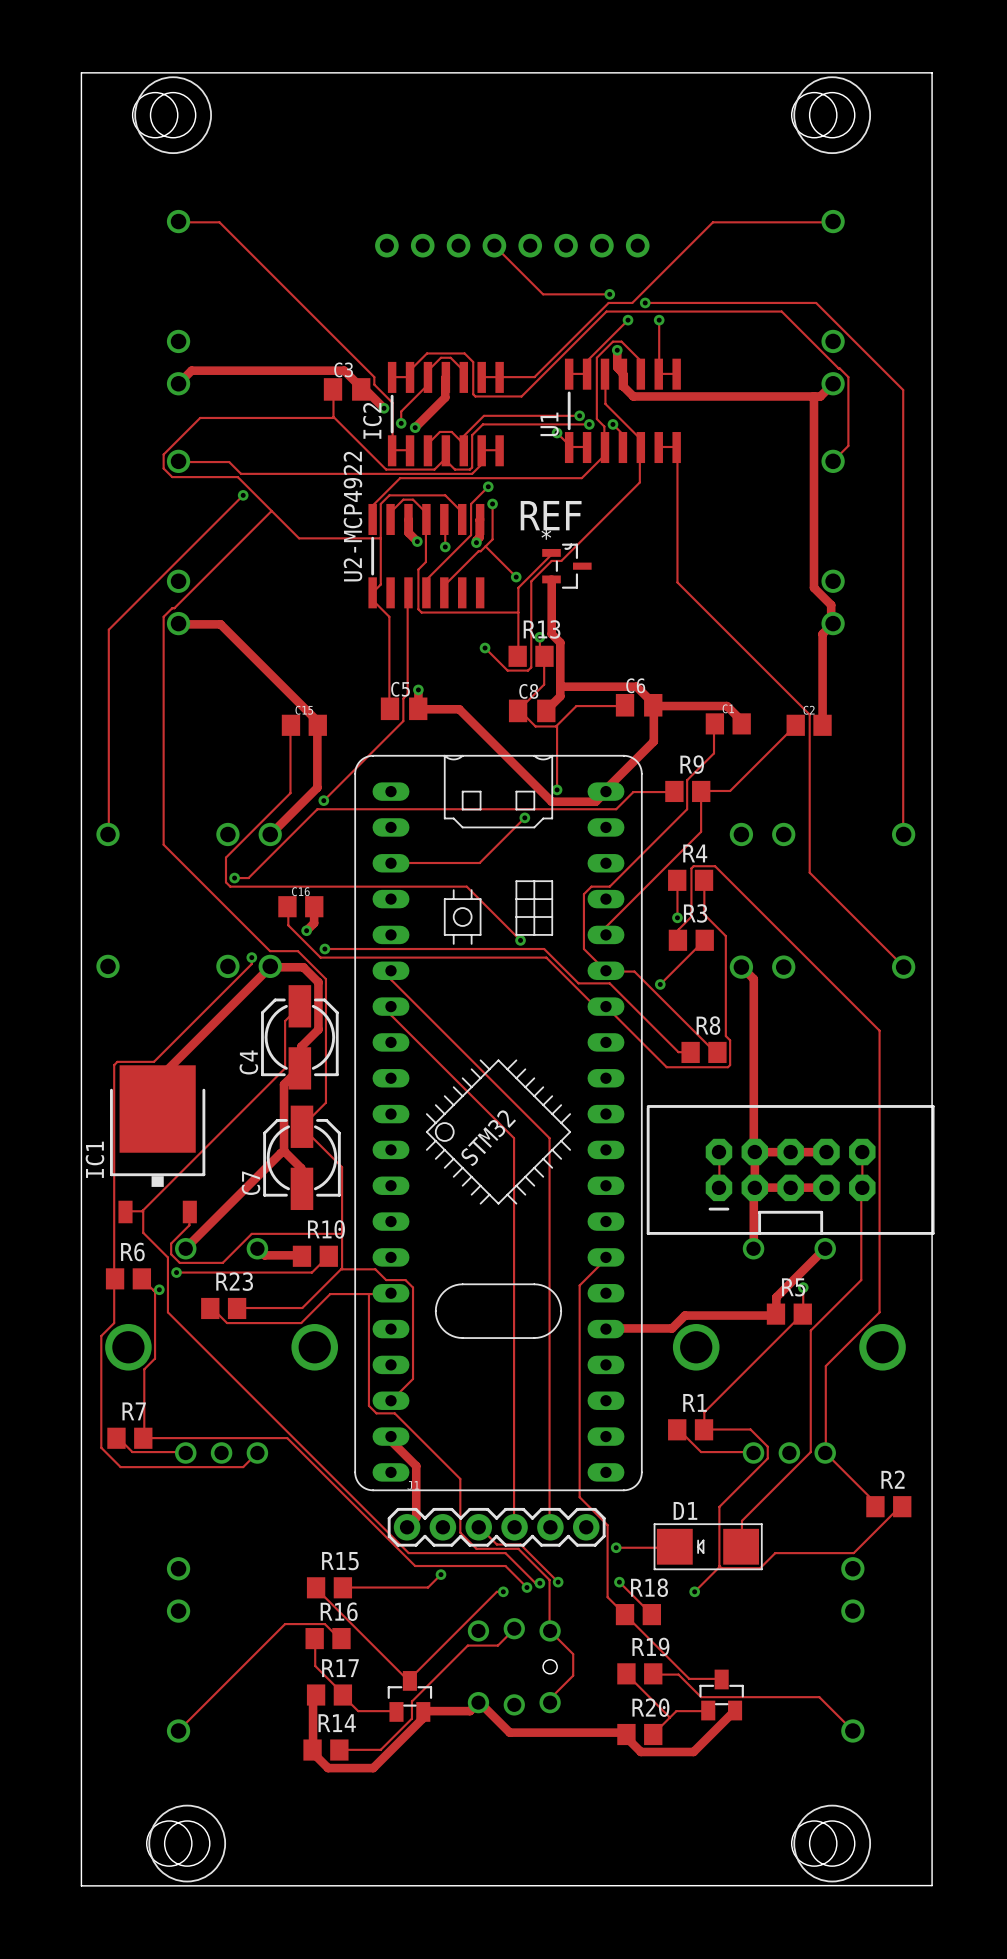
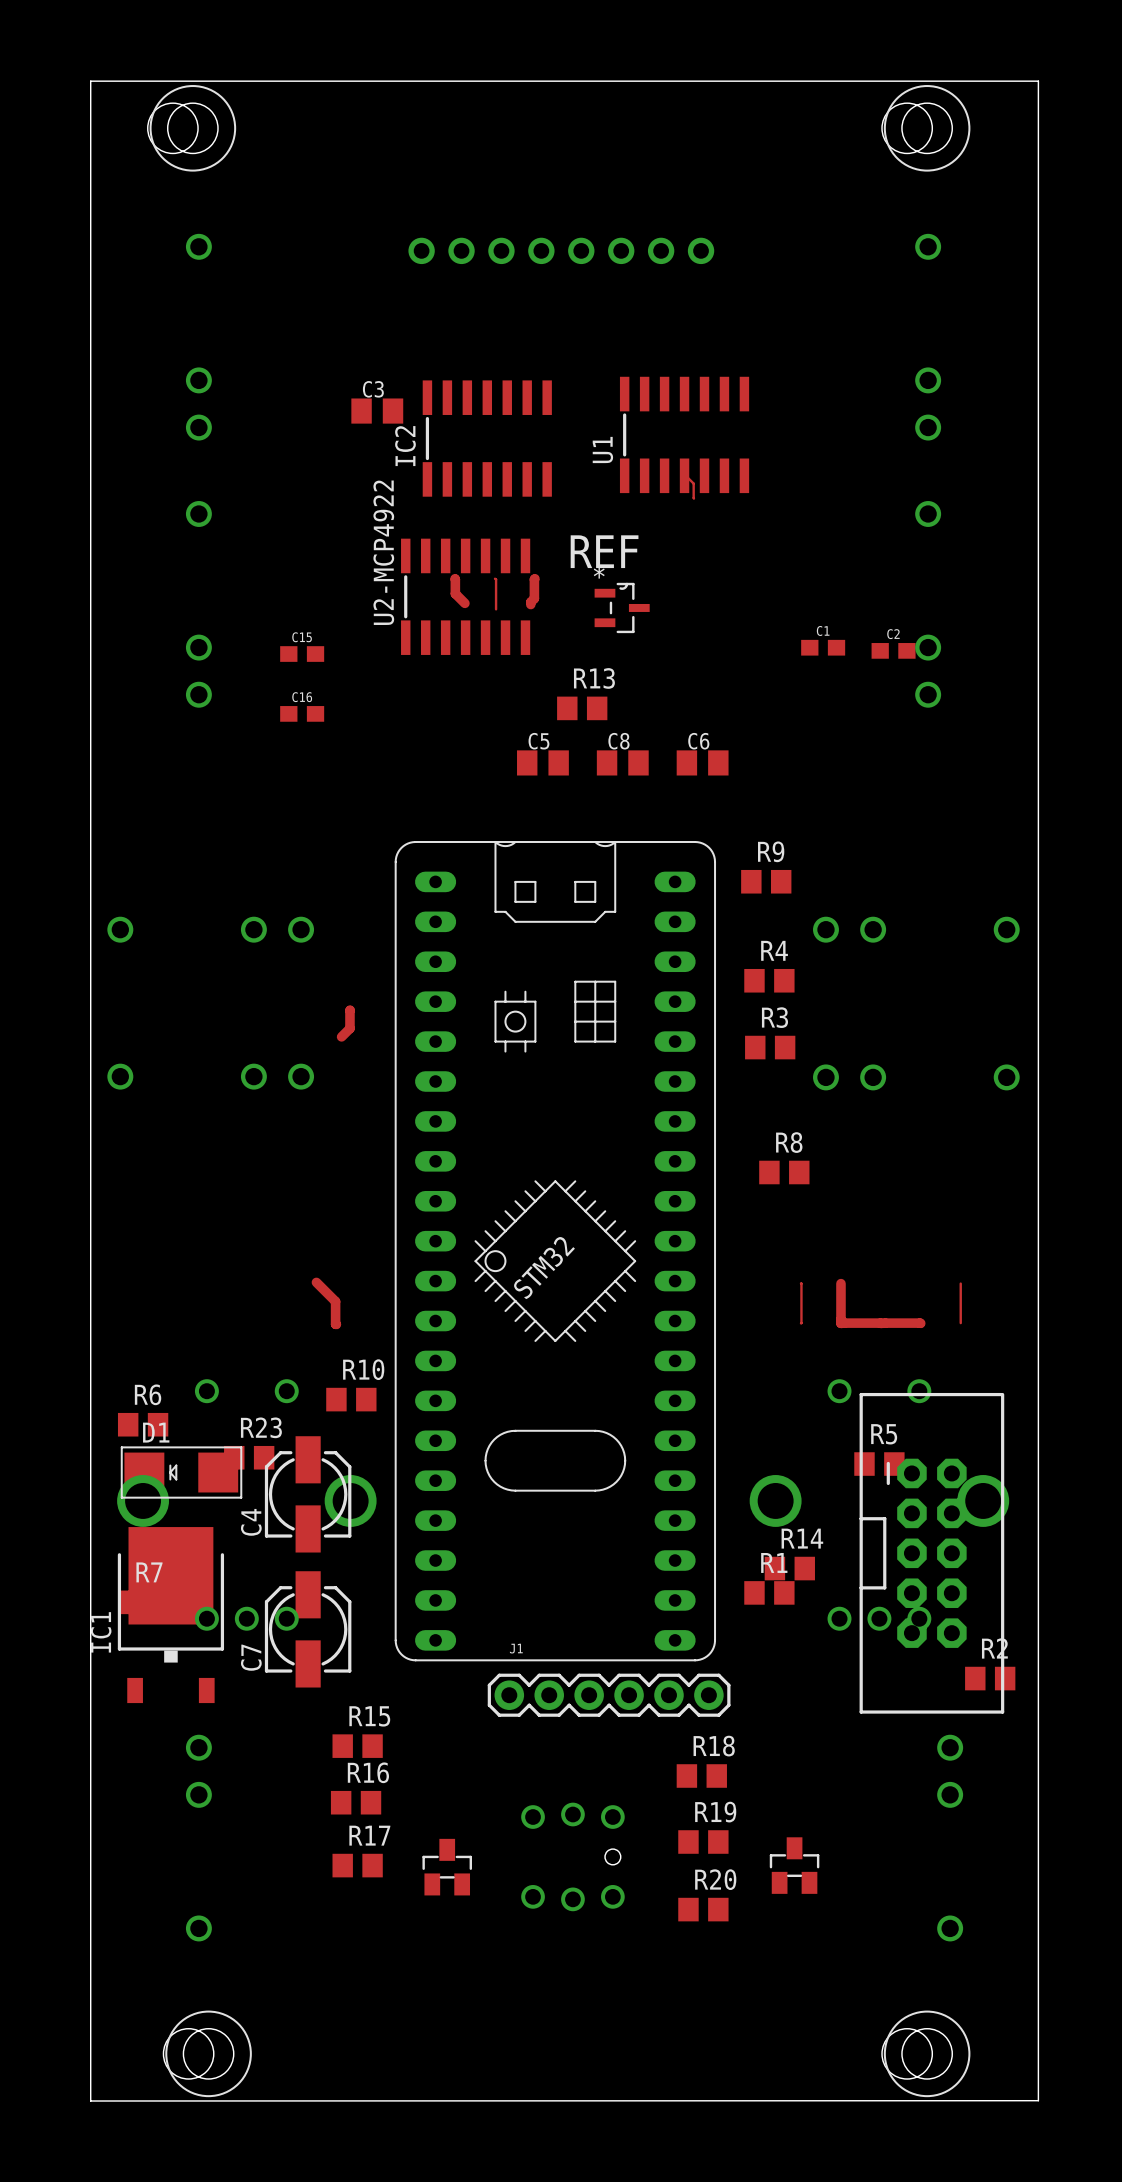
track: (178, 221) (219, 222) (374, 377) (374, 384) (392, 402) (392, 450) (410, 450) -> none
track: (833, 221) (712, 222) (632, 302) (608, 302) (534, 377) (481, 377) -> none
track: (494, 245) (543, 294) (609, 294) -> none
part position: (512, 245) -> (561, 250)
via: (609, 294) -> none
track: (645, 302) (816, 302) (903, 390) (903, 834) -> none
via: (645, 302) -> none
track: (628, 320) (586, 362) (587, 374) (569, 374) -> none
via: (628, 320) -> none
track: (659, 320) (658, 374) (676, 374) -> none
via: (659, 320) -> none
track: (617, 350) (617, 367) (623, 374) (623, 386) (633, 396) (820, 396) (833, 383) -> none
via: (617, 350) -> none
track: (604, 374) (605, 403) (639, 438) (639, 482) (561, 560) (551, 560) (531, 581) (531, 667) (528, 670) (507, 670) (485, 648) -> none
track: (640, 374) (639, 359) (621, 341) (612, 341) (596, 357) (596, 419) (604, 426) (604, 455) (581, 478) (400, 478) (373, 505) (372, 519) -> none
track: (392, 377) (410, 377) (409, 370) (427, 353) (464, 353) (473, 362) (473, 394) (475, 396) (521, 396) (606, 311) (781, 311) (848, 377) (848, 445) (833, 461) -> none
track: (445, 377) (445, 397) (415, 427) -> none
track: (463, 377) (463, 370) (450, 357) (440, 357) (428, 370) (427, 385) (401, 411) (401, 423) -> none
track: (178, 383) (191, 370) (344, 370) (360, 388) (365, 390) (384, 408) -> none
track: (333, 389) (333, 416) (386, 469) (434, 469) (445, 458) (445, 450) (445, 459) (454, 469) (470, 469) (472, 467) (472, 435) (482, 424) (589, 424) -> none
C3 position: (347, 389) -> (377, 411)
track: (813, 396) (813, 587) (831, 605) (831, 620) (833, 623) (822, 634) (822, 725) -> none
via: (384, 408) -> none
U1 position: (622, 410) -> (684, 434)
IC2 position: (445, 414) -> (487, 438)
track: (579, 415) (483, 415) (460, 439) (463, 450) (463, 443) (451, 431) (439, 431) (428, 443) (427, 450) -> none
via: (579, 415) -> none
track: (334, 417) (200, 417) (163, 454) (163, 468) (172, 477) (237, 477) (299, 538) (380, 538) -> none
via: (401, 423) -> none
via: (589, 424) -> none
via: (612, 424) -> none
via: (415, 427) -> none
track: (557, 433) (569, 445) (569, 447) (587, 447) -> none
via: (557, 433) -> none
track: (658, 447) (677, 448) (677, 582) (809, 714) (809, 872) (903, 967) -> none
track: (499, 450) (481, 450) (480, 465) (472, 473) (241, 473) (229, 462) (178, 461) -> none
track: (488, 486) (471, 503) (471, 535) (427, 579) (426, 592) -> none
via: (488, 486) -> none
track: (243, 495) (108, 629) (108, 834) -> none
via: (243, 495) -> none
track: (492, 503) (492, 539) (445, 584) (444, 592) -> none
via: (492, 503) -> none
track: (271, 510) (163, 616) (163, 844) (270, 951) (298, 951) (325, 979) (325, 1102) (301, 1126) (342, 1167) (342, 1268) (302, 1308) (237, 1308) -> none
track: (390, 519) (391, 511) (403, 499) (413, 499) (425, 512) (425, 562) (418, 569) (418, 609) (421, 612) (518, 612) -> none
track: (462, 519) (461, 511) (445, 495) (389, 495) (380, 503) (380, 584) (372, 592) (373, 600) (389, 616) (390, 708) -> none
via: (417, 541) -> none
via: (476, 542) -> none
via: (445, 546) -> none
track: (485, 546) (516, 577) -> none
track: (551, 552) (518, 587) (517, 656) -> none
U2-MCP4922 position: (426, 556) -> (465, 596)
REF position: (566, 566) -> (622, 607)
via: (516, 577) -> none
track: (551, 579) (551, 634) (560, 642) (560, 696) (546, 710) -> none
track: (408, 592) (407, 694) (403, 698) (403, 721) (323, 800) -> none
track: (178, 623) (220, 624) (317, 721) (317, 787) (270, 834) -> none
track: (539, 637) (539, 651) (544, 656) (544, 684) (518, 710) (535, 726) (556, 726) (576, 706) (625, 705) -> none
via: (539, 637) -> none
via: (485, 648) -> none
R13 position: (531, 656) -> (582, 708)
track: (560, 686) (636, 686) (653, 705) -> none
track: (418, 689) (418, 709) (459, 709) (551, 801) (595, 801) (653, 741) (653, 705) -> none
via: (418, 689) -> none
C6 position: (639, 705) -> (702, 762)
track: (653, 705) (726, 706) (740, 720) (741, 723) -> none
C5 position: (404, 708) -> (542, 762)
C8 position: (532, 710) -> (622, 762)
C1 footprint: [705, 713, 751, 735] -> [801, 639, 846, 656]
C15 footprint: [281, 714, 327, 736] -> [280, 646, 325, 662]
C2 footprint: [786, 714, 832, 736] -> [871, 643, 916, 659]
track: (714, 723) (714, 753) (687, 780) (687, 809) (609, 886) (591, 886) (583, 894) (583, 948) (606, 971) (634, 971) (717, 1052) -> none
track: (290, 725) (290, 793) (225, 857) (225, 882) (230, 886) (466, 886) (520, 940) -> none
track: (556, 725) (557, 789) -> none
track: (795, 725) (730, 790) (701, 791) (701, 831) (606, 926) (605, 934) -> none
via: (557, 789) -> none
track: (674, 791) (633, 792) (616, 809) (317, 809) (248, 878) (234, 878) -> none
via: (323, 800) -> none
track: (524, 817) (479, 863) (390, 863) -> none
via: (524, 817) -> none
via: (234, 878) -> none
track: (677, 880) (677, 917) -> none
track: (704, 880) (704, 914) (725, 936) (725, 1036) (730, 1040) (730, 1065) (727, 1067) (666, 1067) (605, 1005) (594, 1005) (546, 957) (320, 957) (288, 925) (287, 906) -> none
C16 footprint: [278, 896, 324, 918] -> [280, 706, 325, 722]
via: (677, 917) -> none
via: (306, 930) -> none
via: (520, 940) -> none
track: (677, 940) (678, 929) (691, 916) (691, 868) (693, 866) (715, 866) (879, 1030) (879, 1312) (825, 1366) (825, 1452) (875, 1502) (875, 1506) -> none
track: (704, 940) (660, 984) -> none
track: (324, 948) (544, 948) (578, 983) (609, 983) (678, 1052) (690, 1052) -> none
via: (324, 948) -> none
track: (251, 957) (251, 964) (153, 1061) (117, 1061) (114, 1065) (114, 1323) (101, 1335) (101, 1447) (120, 1467) (243, 1467) (257, 1452) -> none
via: (251, 957) -> none
track: (741, 967) (753, 979) (754, 1152) (826, 1152) -> none
track: (390, 970) (391, 980) (549, 1138) (550, 1527) -> none
via: (660, 984) -> none
track: (299, 1006) (285, 1021) (285, 1068) (142, 1211) (125, 1211) -> none
track: (390, 1006) (391, 1015) (514, 1138) (514, 1527) -> none
C4 position: (299, 1037) -> (308, 1494)
track: (157, 1109) (158, 1079) (270, 966) (303, 967) (318, 982) (318, 1029) (301, 1046) (299, 1068) (284, 1084) (284, 1151) (185, 1248) -> none
IC1 position: (157, 1144) -> (170, 1615)
C7 position: (301, 1157) -> (308, 1629)
part rotation: 0° (790, 1169) -> 90° clockwise (931, 1553)
part position: (790, 1169) -> (931, 1553)
track: (754, 1187) (753, 1248) -> none
track: (862, 1187) (861, 1280) (810, 1330) (810, 1452) (741, 1520) (741, 1546) -> none
track: (142, 1210) (143, 1232) (167, 1257) (167, 1312) (408, 1553) (505, 1553) (535, 1583) (539, 1583) -> none
track: (189, 1211) (189, 1225) (171, 1243) (171, 1254) (179, 1262) (222, 1262) (251, 1233) (342, 1233) -> none
track: (257, 1248) (264, 1255) (301, 1256) -> none
track: (825, 1248) (776, 1297) (775, 1314) (684, 1315) (672, 1328) (605, 1329) -> none
track: (328, 1256) (311, 1272) (176, 1272) -> none
track: (605, 1257) (579, 1285) (579, 1497) (607, 1525) (607, 1597) (689, 1678) (721, 1679) -> none
track: (341, 1268) (375, 1269) (386, 1280) (405, 1280) (413, 1287) (413, 1378) (390, 1400) -> none
via: (176, 1272) -> none
track: (141, 1278) (155, 1291) (155, 1358) (144, 1369) (143, 1438) (287, 1438) (415, 1566) (505, 1566) (526, 1587) -> none
track: (803, 1287) (802, 1314) (704, 1412) (704, 1429) (750, 1429) (767, 1446) (767, 1458) (719, 1506) (719, 1566) (721, 1568) (760, 1568) (775, 1553) (853, 1553) (902, 1506) -> none
via: (803, 1287) -> none
via: (159, 1289) -> none
track: (390, 1293) (330, 1294) (301, 1323) (227, 1323) (210, 1308) -> none
track: (368, 1294) (368, 1405) (376, 1413) (394, 1413) (460, 1478) (460, 1532) (476, 1548) (518, 1548) (549, 1579) (549, 1630) (573, 1654) (573, 1675) (550, 1698) (550, 1702) -> none
track: (677, 1429) (701, 1452) (753, 1452) -> none
track: (390, 1436) (391, 1441) (416, 1466) (416, 1517) (407, 1527) -> none
track: (116, 1438) (132, 1452) (185, 1452) -> none
track: (478, 1527) (496, 1544) (520, 1544) (558, 1582) -> none
J1 position: (496, 1527) -> (609, 1695)
track: (674, 1546) (616, 1547) -> none
D1 position: (708, 1546) -> (181, 1472)
via: (616, 1547) -> none
track: (719, 1566) (694, 1591) -> none
track: (440, 1574) (428, 1587) (342, 1587) -> none
via: (440, 1574) -> none
via: (558, 1582) -> none
track: (619, 1582) (651, 1614) -> none
via: (619, 1582) -> none
via: (539, 1583) -> none
track: (316, 1587) (409, 1680) (496, 1591) (503, 1591) -> none
R15 position: (329, 1587) -> (357, 1746)
via: (526, 1587) -> none
via: (503, 1591) -> none
via: (694, 1591) -> none
R18 position: (638, 1614) -> (701, 1776)
track: (514, 1628) (497, 1645) (467, 1645) (411, 1701) (411, 1718) (380, 1749) (339, 1750) -> none
track: (314, 1638) (315, 1665) (358, 1711) (396, 1711) -> none
R16 position: (328, 1638) -> (356, 1802)
track: (341, 1638) (324, 1624) (285, 1624) (178, 1730) -> none
track: (626, 1673) (669, 1717) -> none
R19 position: (639, 1673) -> (703, 1842)
track: (653, 1673) (678, 1674) (701, 1697) (819, 1697) (852, 1730) -> none
track: (316, 1695) (313, 1698) (312, 1750) (328, 1768) (373, 1768) (422, 1718) (423, 1711) (470, 1711) (478, 1702) (509, 1732) (622, 1732) (626, 1734) (626, 1738) (640, 1751) (693, 1751) (735, 1710) -> none
R17 position: (329, 1695) -> (357, 1865)
part position: (721, 1695) -> (794, 1865)
part position: (409, 1696) -> (447, 1867)
track: (708, 1710) (676, 1711) (653, 1734) -> none
R20 position: (639, 1734) -> (703, 1909)
R14 position: (325, 1750) -> (789, 1568)

